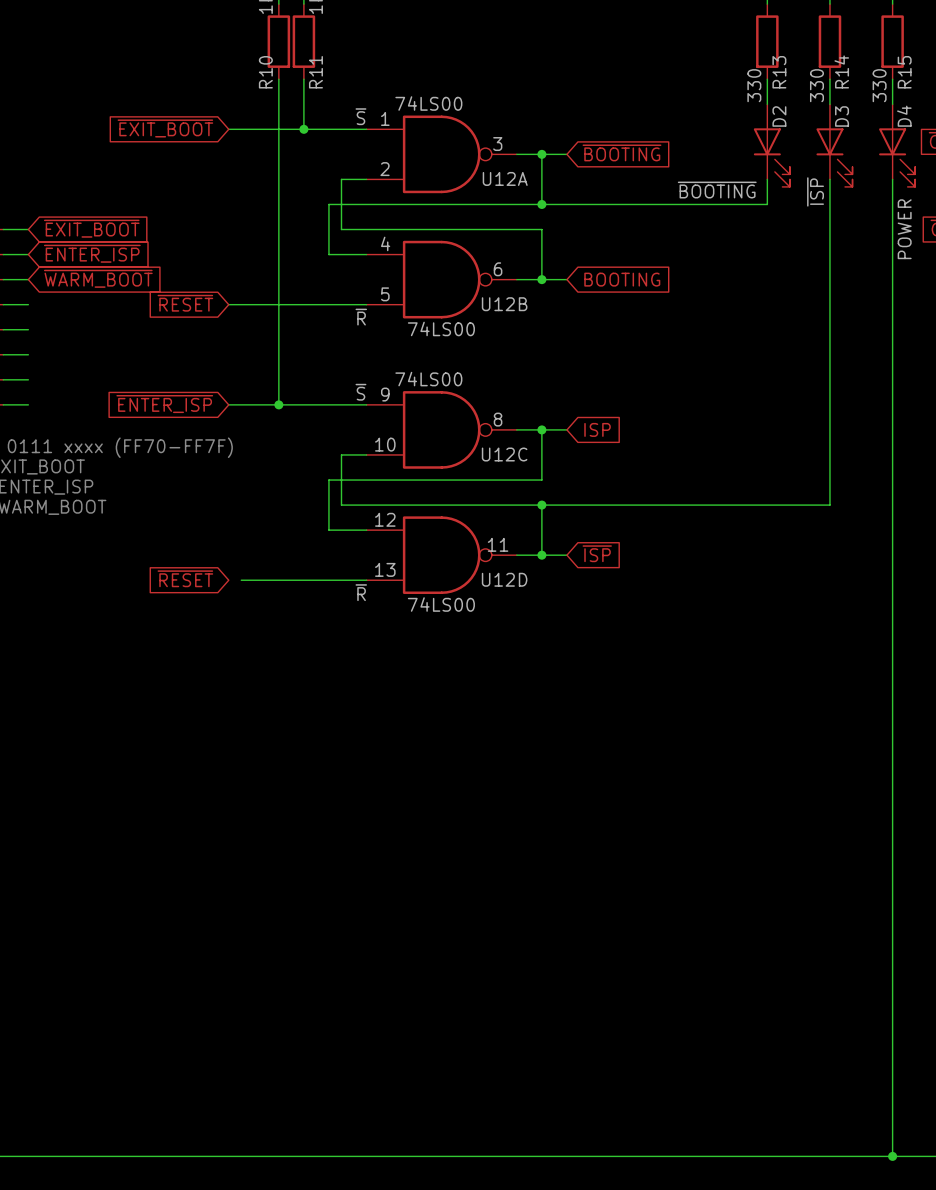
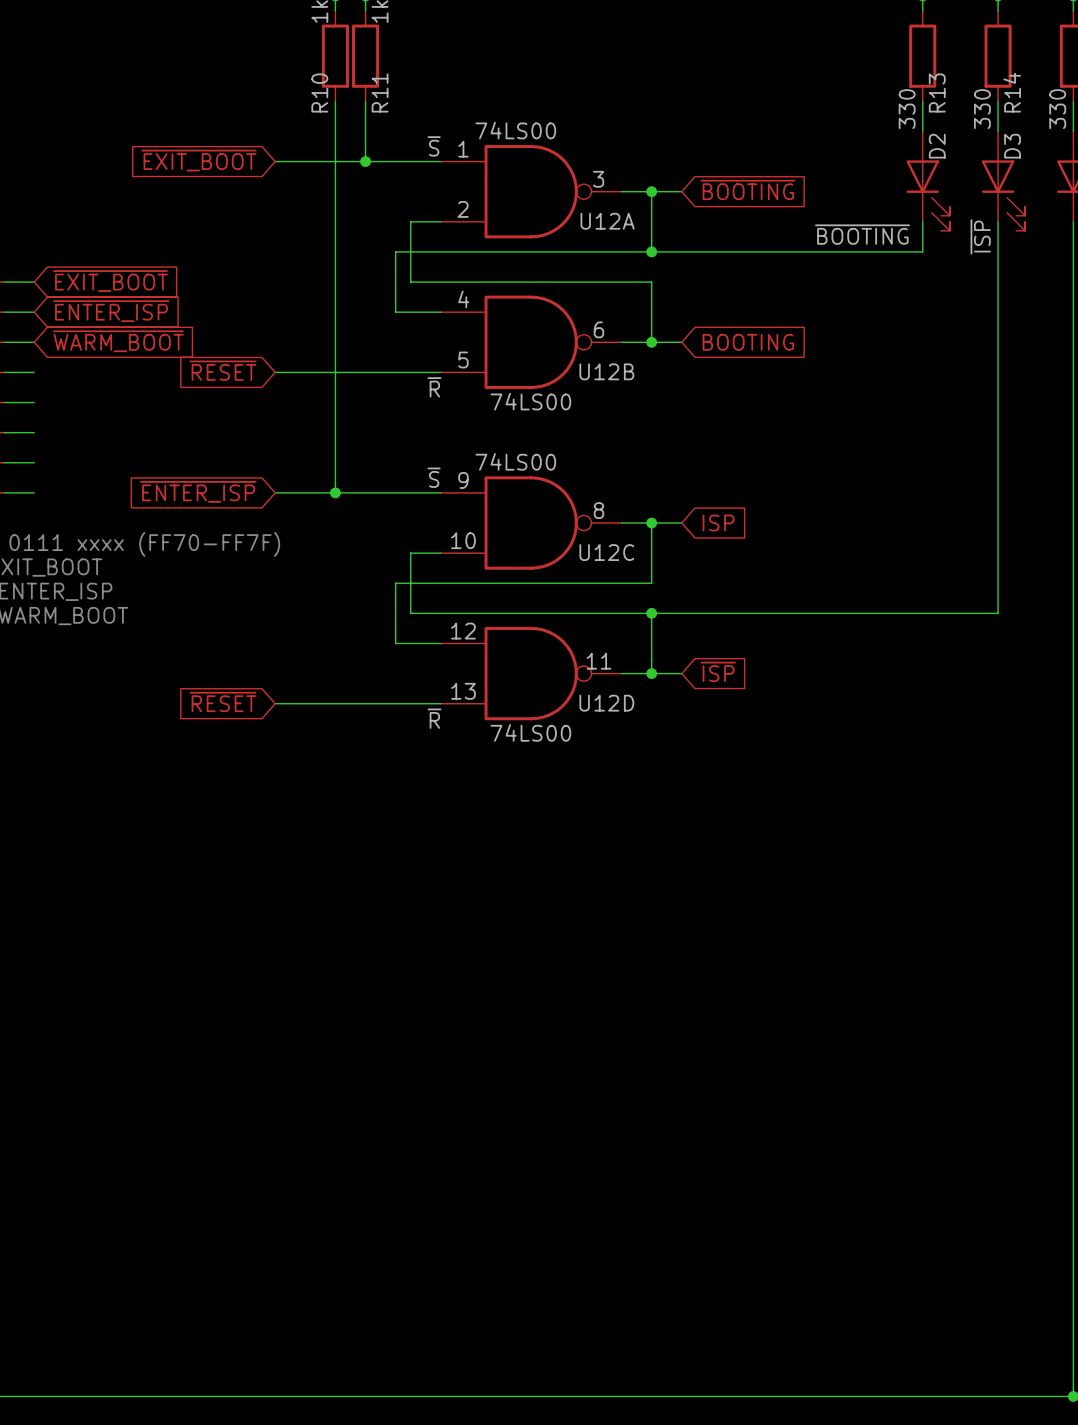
wire: none -> (275, 703) (290, 703)

